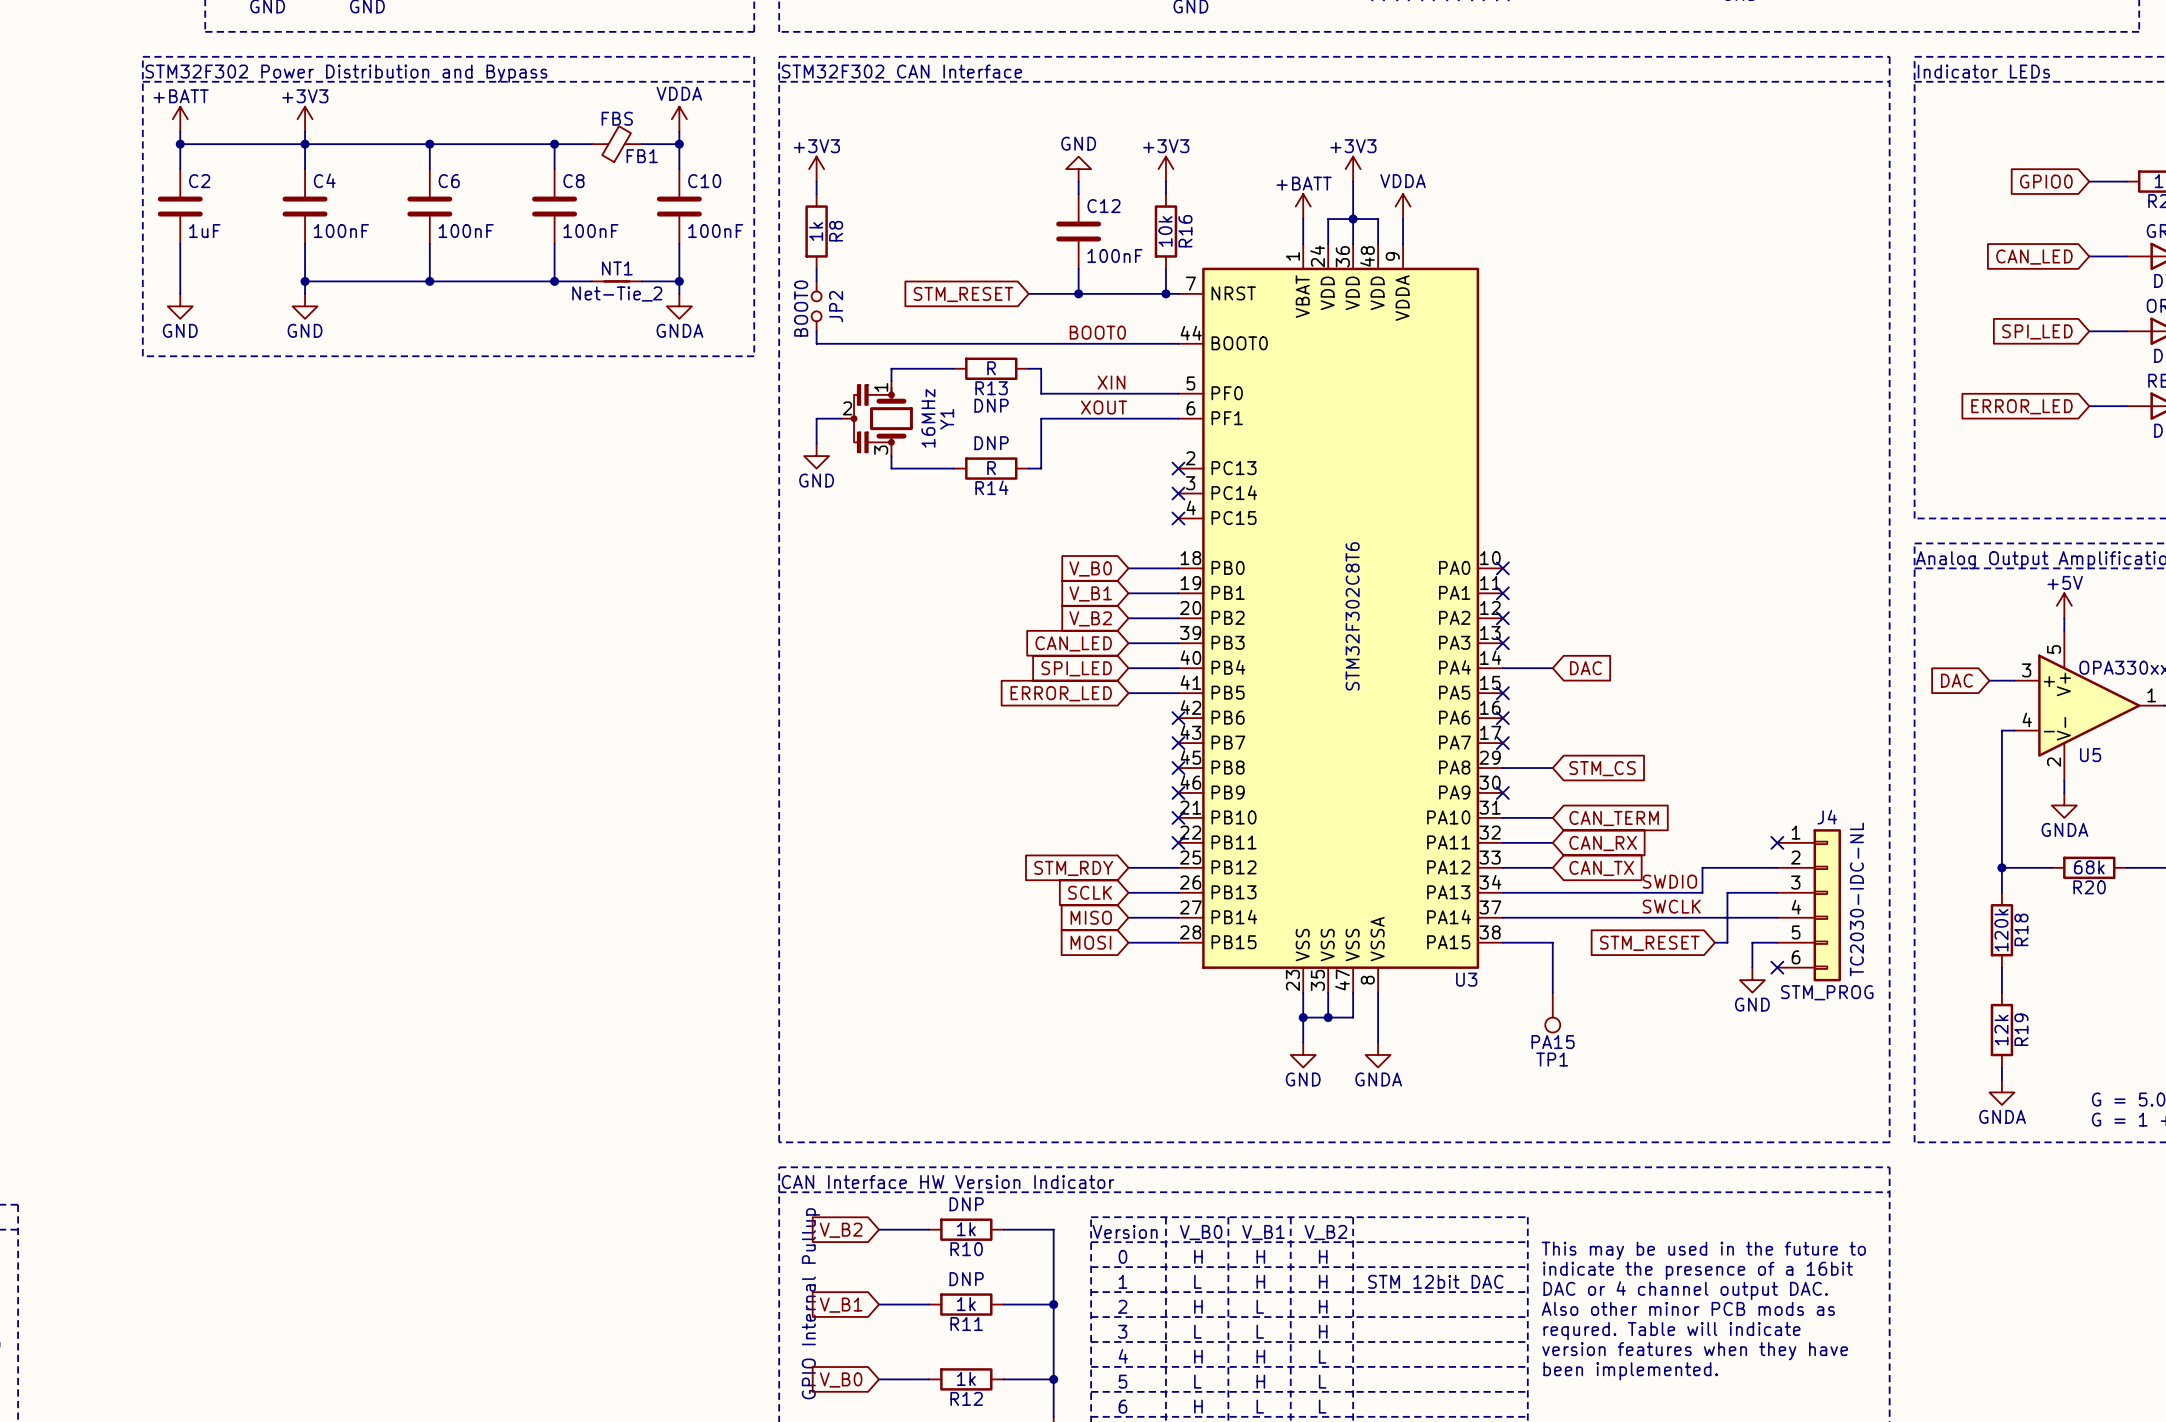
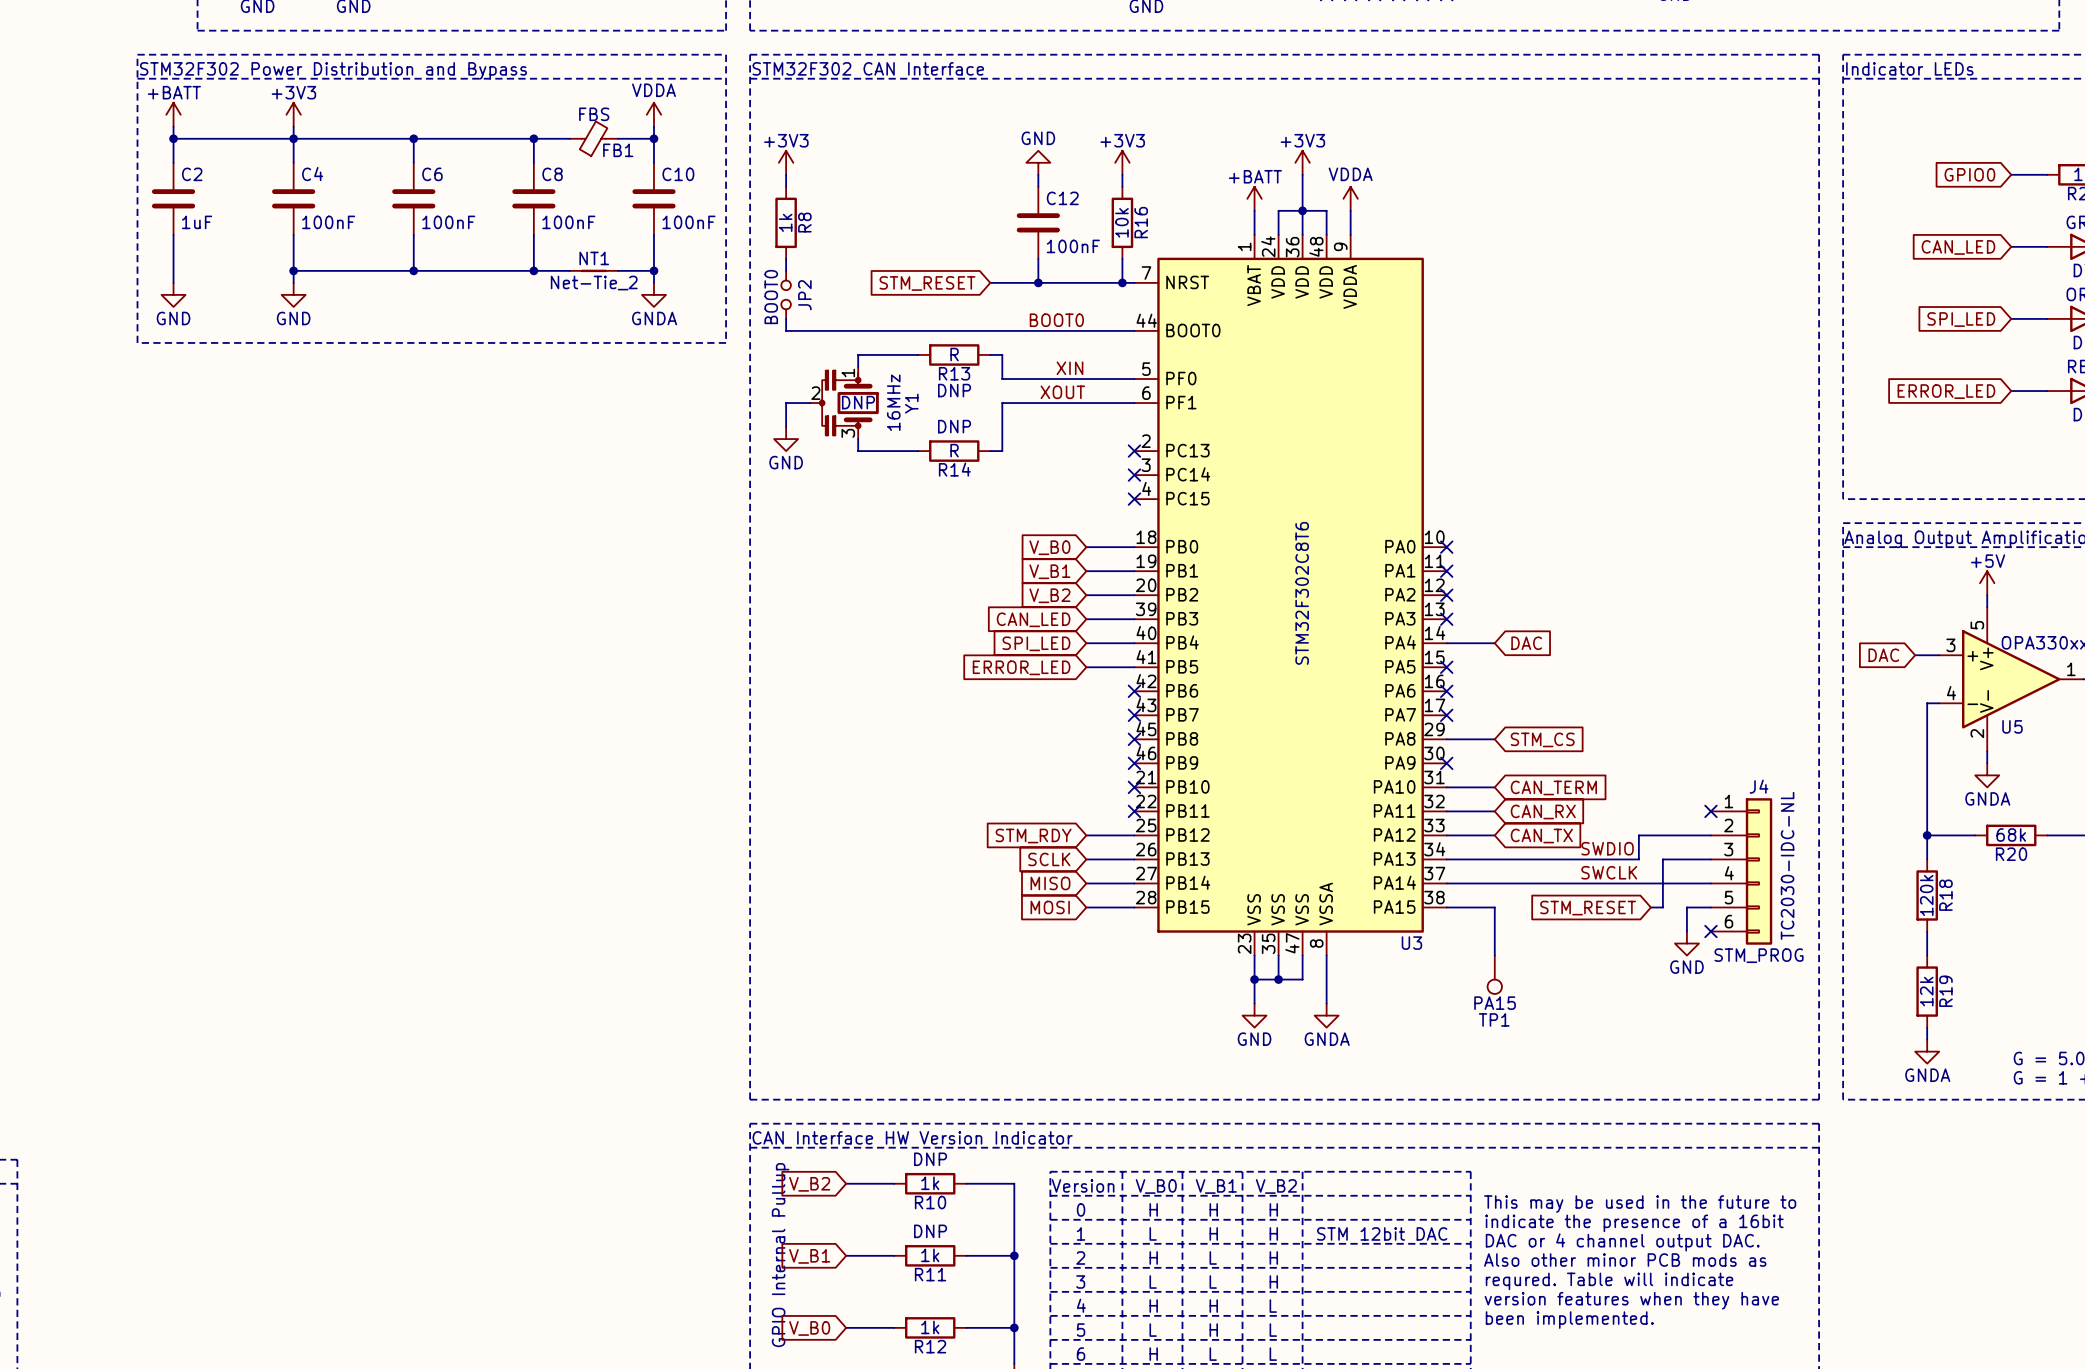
Y1 text: none -> DNP (858, 402)

